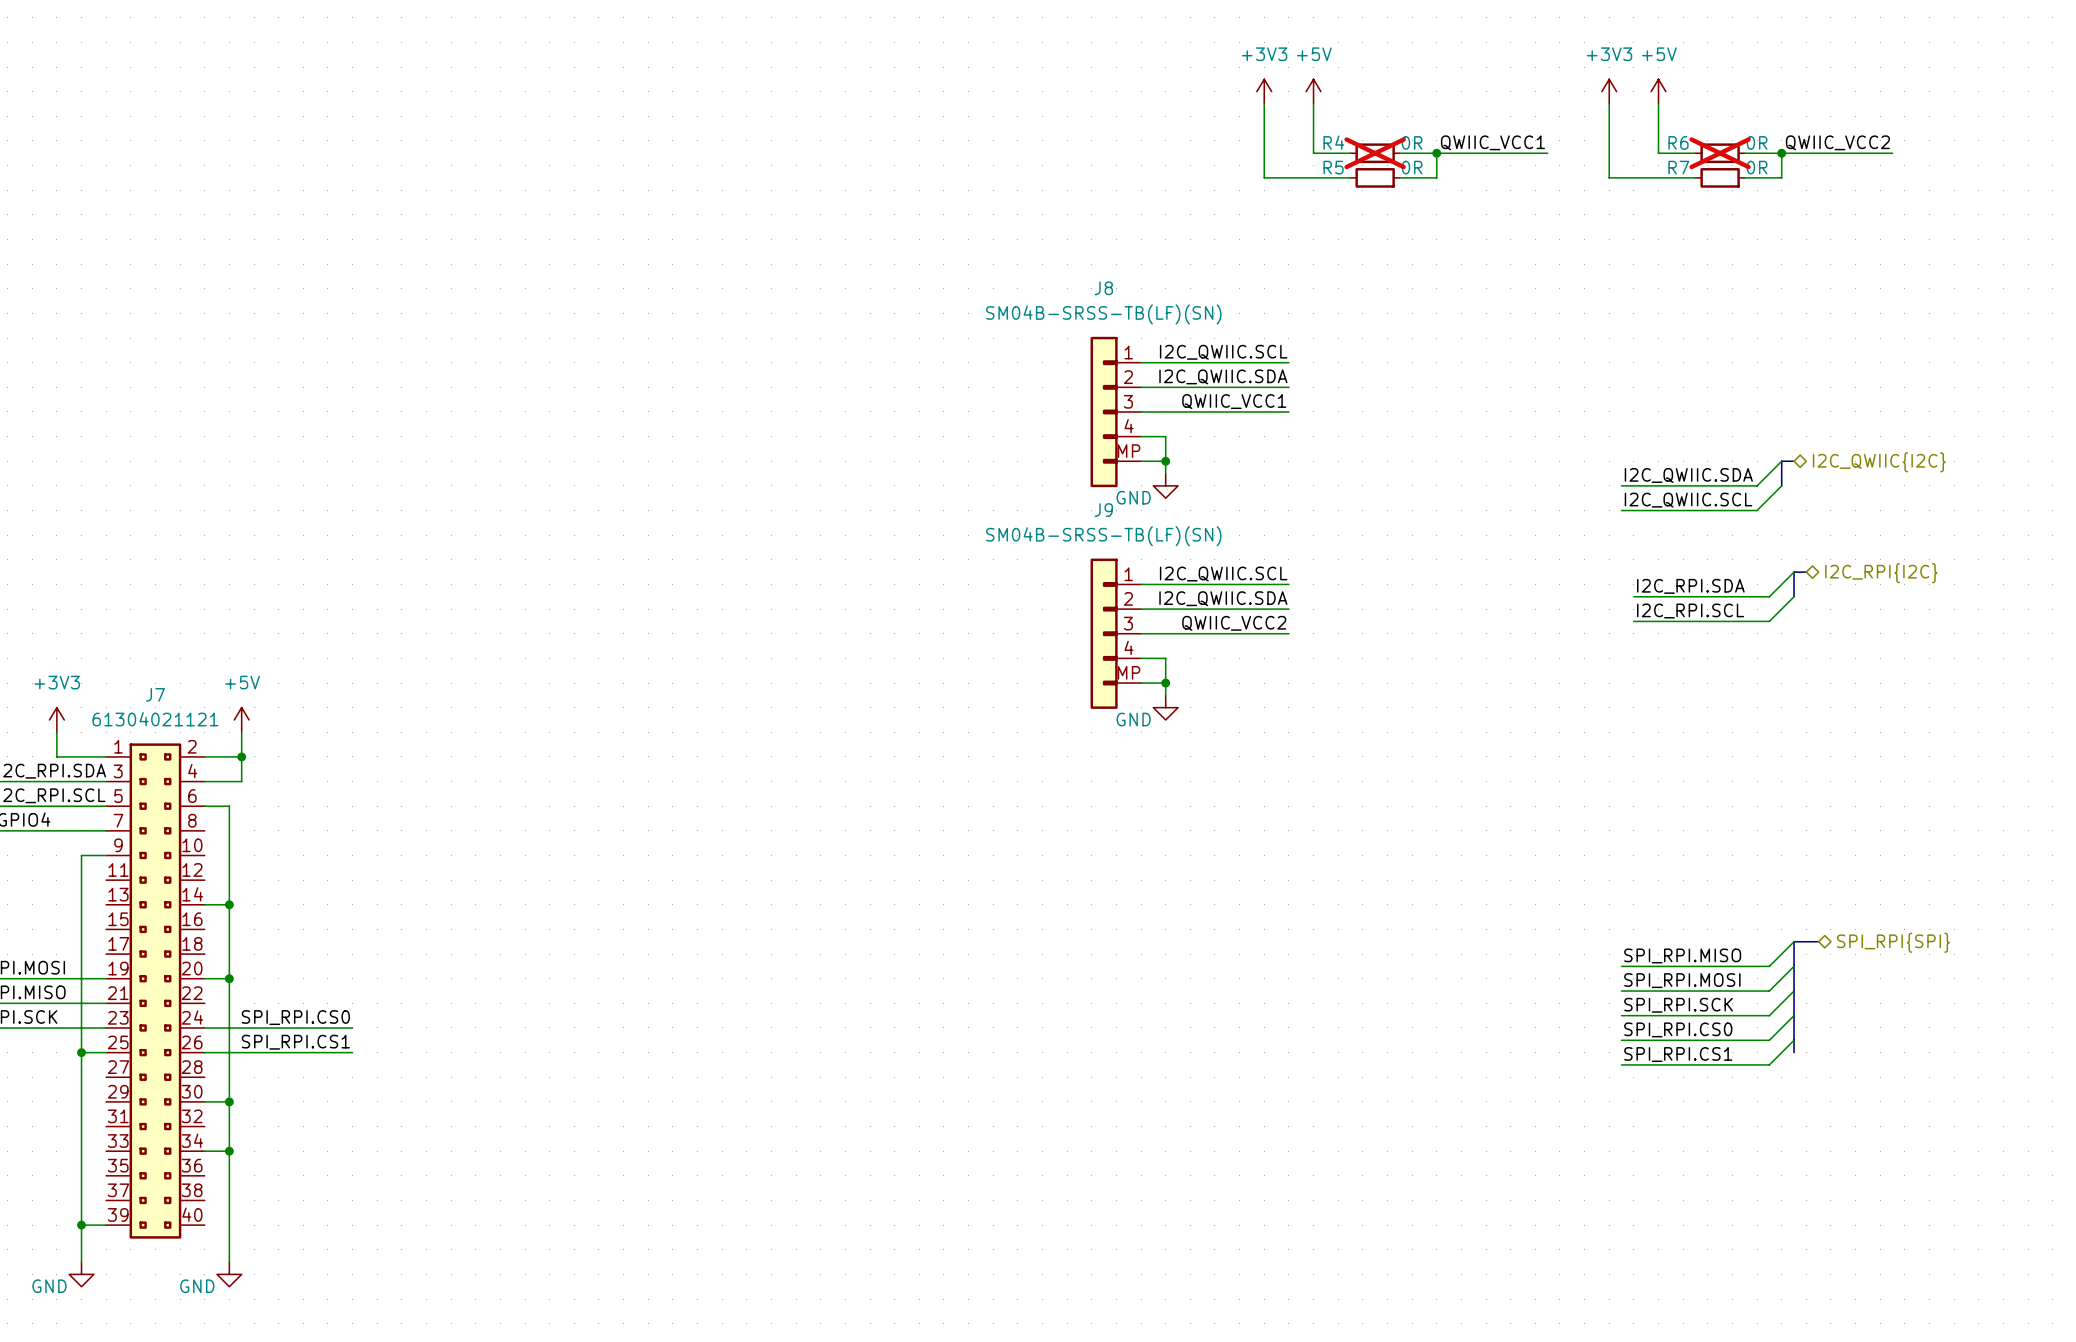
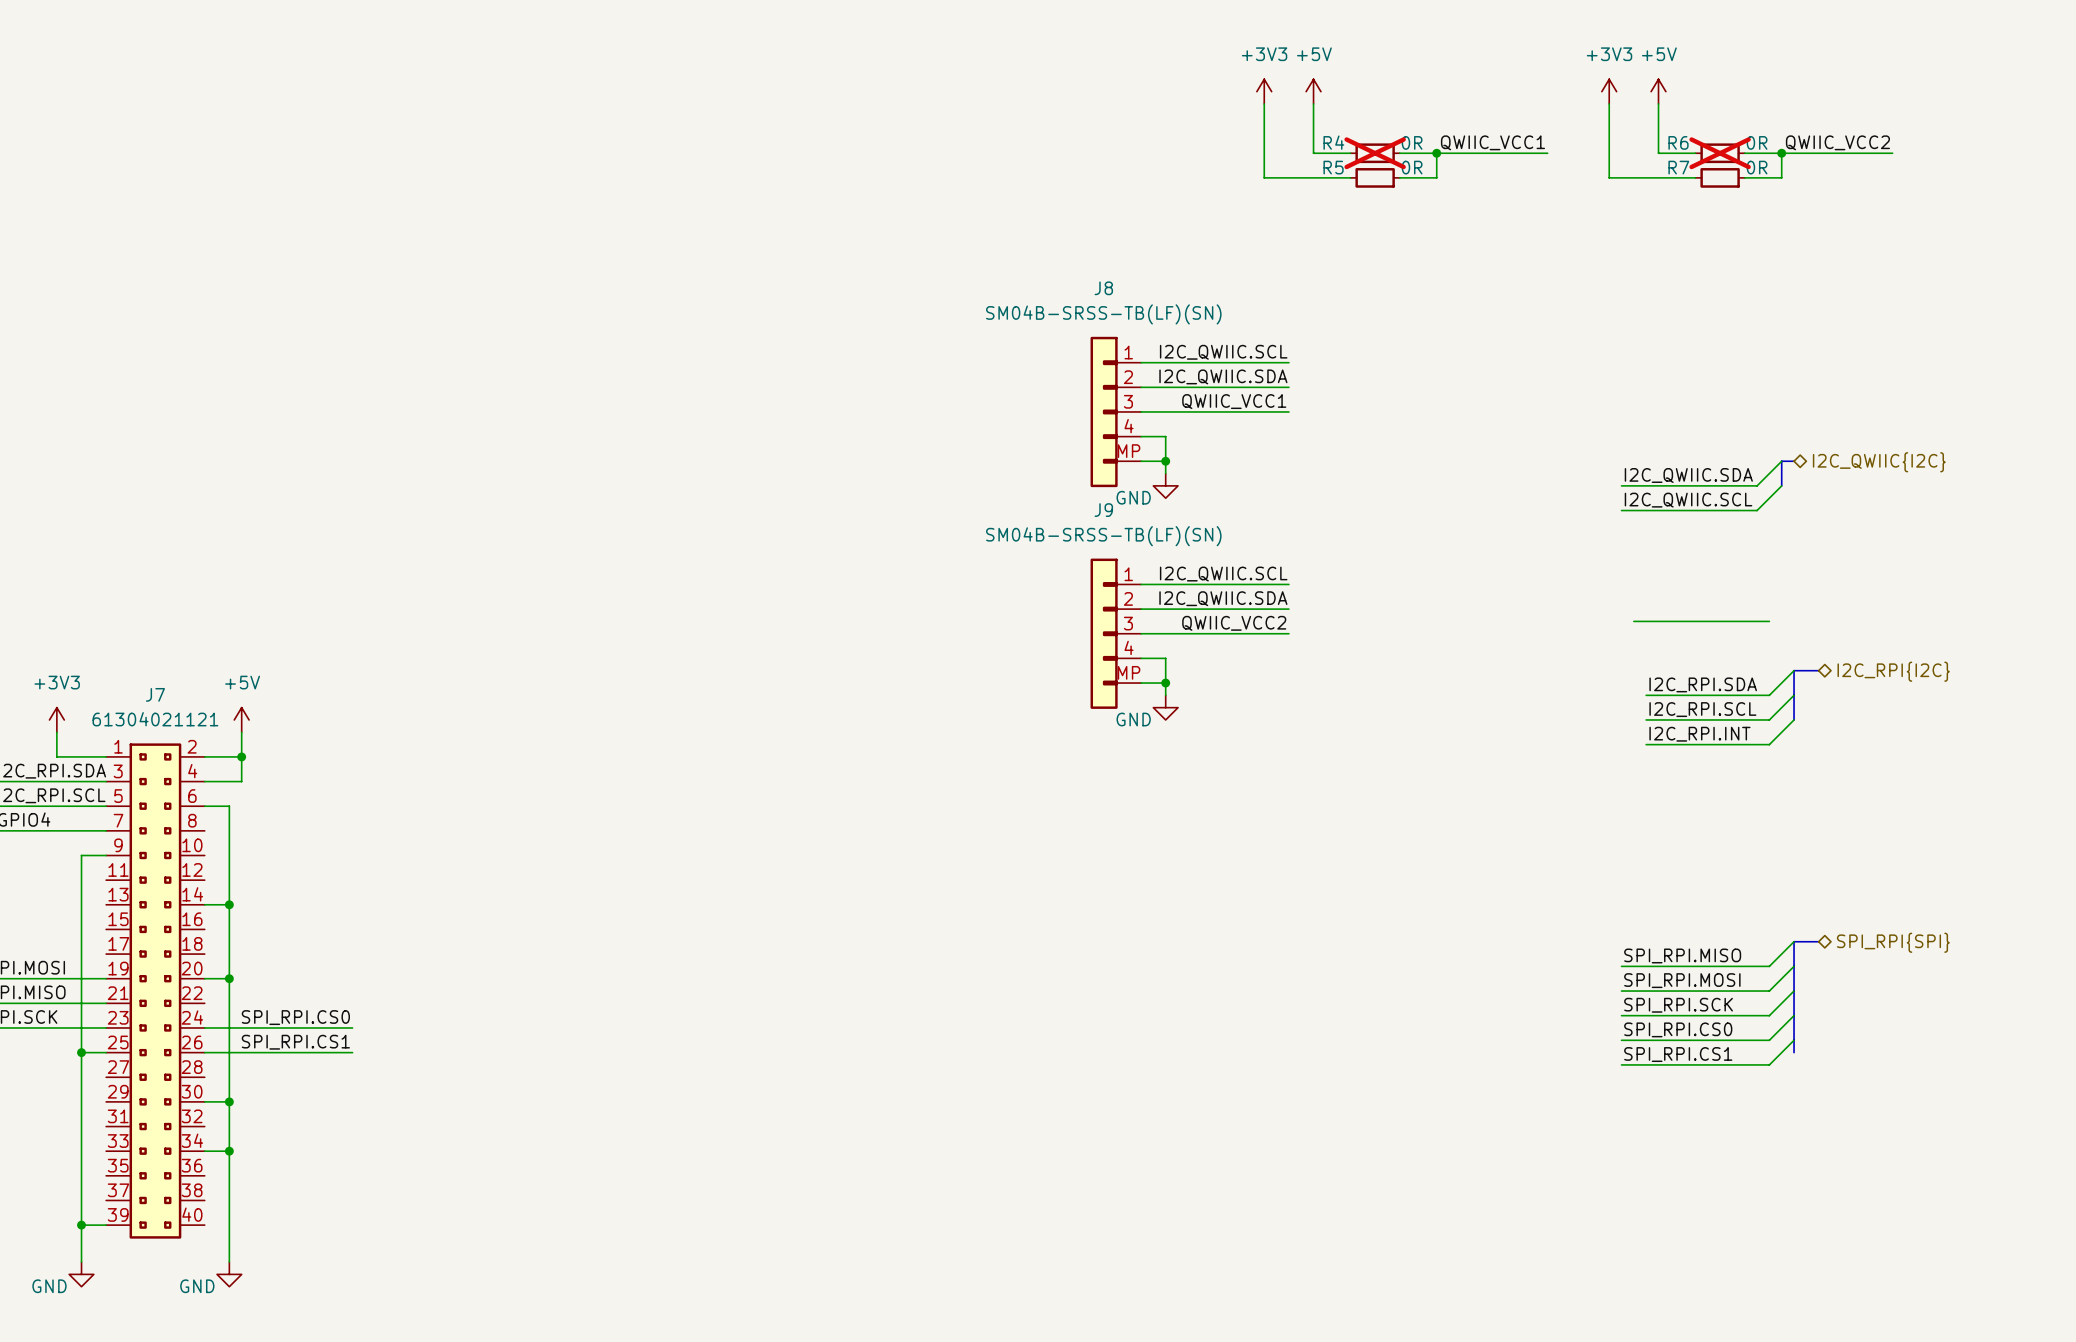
wire: (1794, 572) (1769, 596) (1633, 596) -> none
bus: (1806, 572) (1794, 572) (1794, 596) -> none
hierarchical label position: I2C_RPI{I2C} (1881, 573) -> I2C_RPI{I2C} (1893, 671)
label position: I2C_RPI.SDA (1690, 586) -> I2C_RPI.SDA (1703, 684)
wire: (1794, 596) (1769, 621) -> none
label position: I2C_RPI.SCL (1690, 611) -> I2C_RPI.SCL (1702, 709)
wire: none -> (1794, 670) (1769, 695) (1646, 695)
bus: none -> (1818, 670) (1794, 670) (1794, 719)
wire: none -> (1794, 695) (1769, 719) (1646, 719)
wire: none -> (1794, 719) (1769, 744) (1646, 744)
label: none -> I2C_RPI.INT (1699, 734)

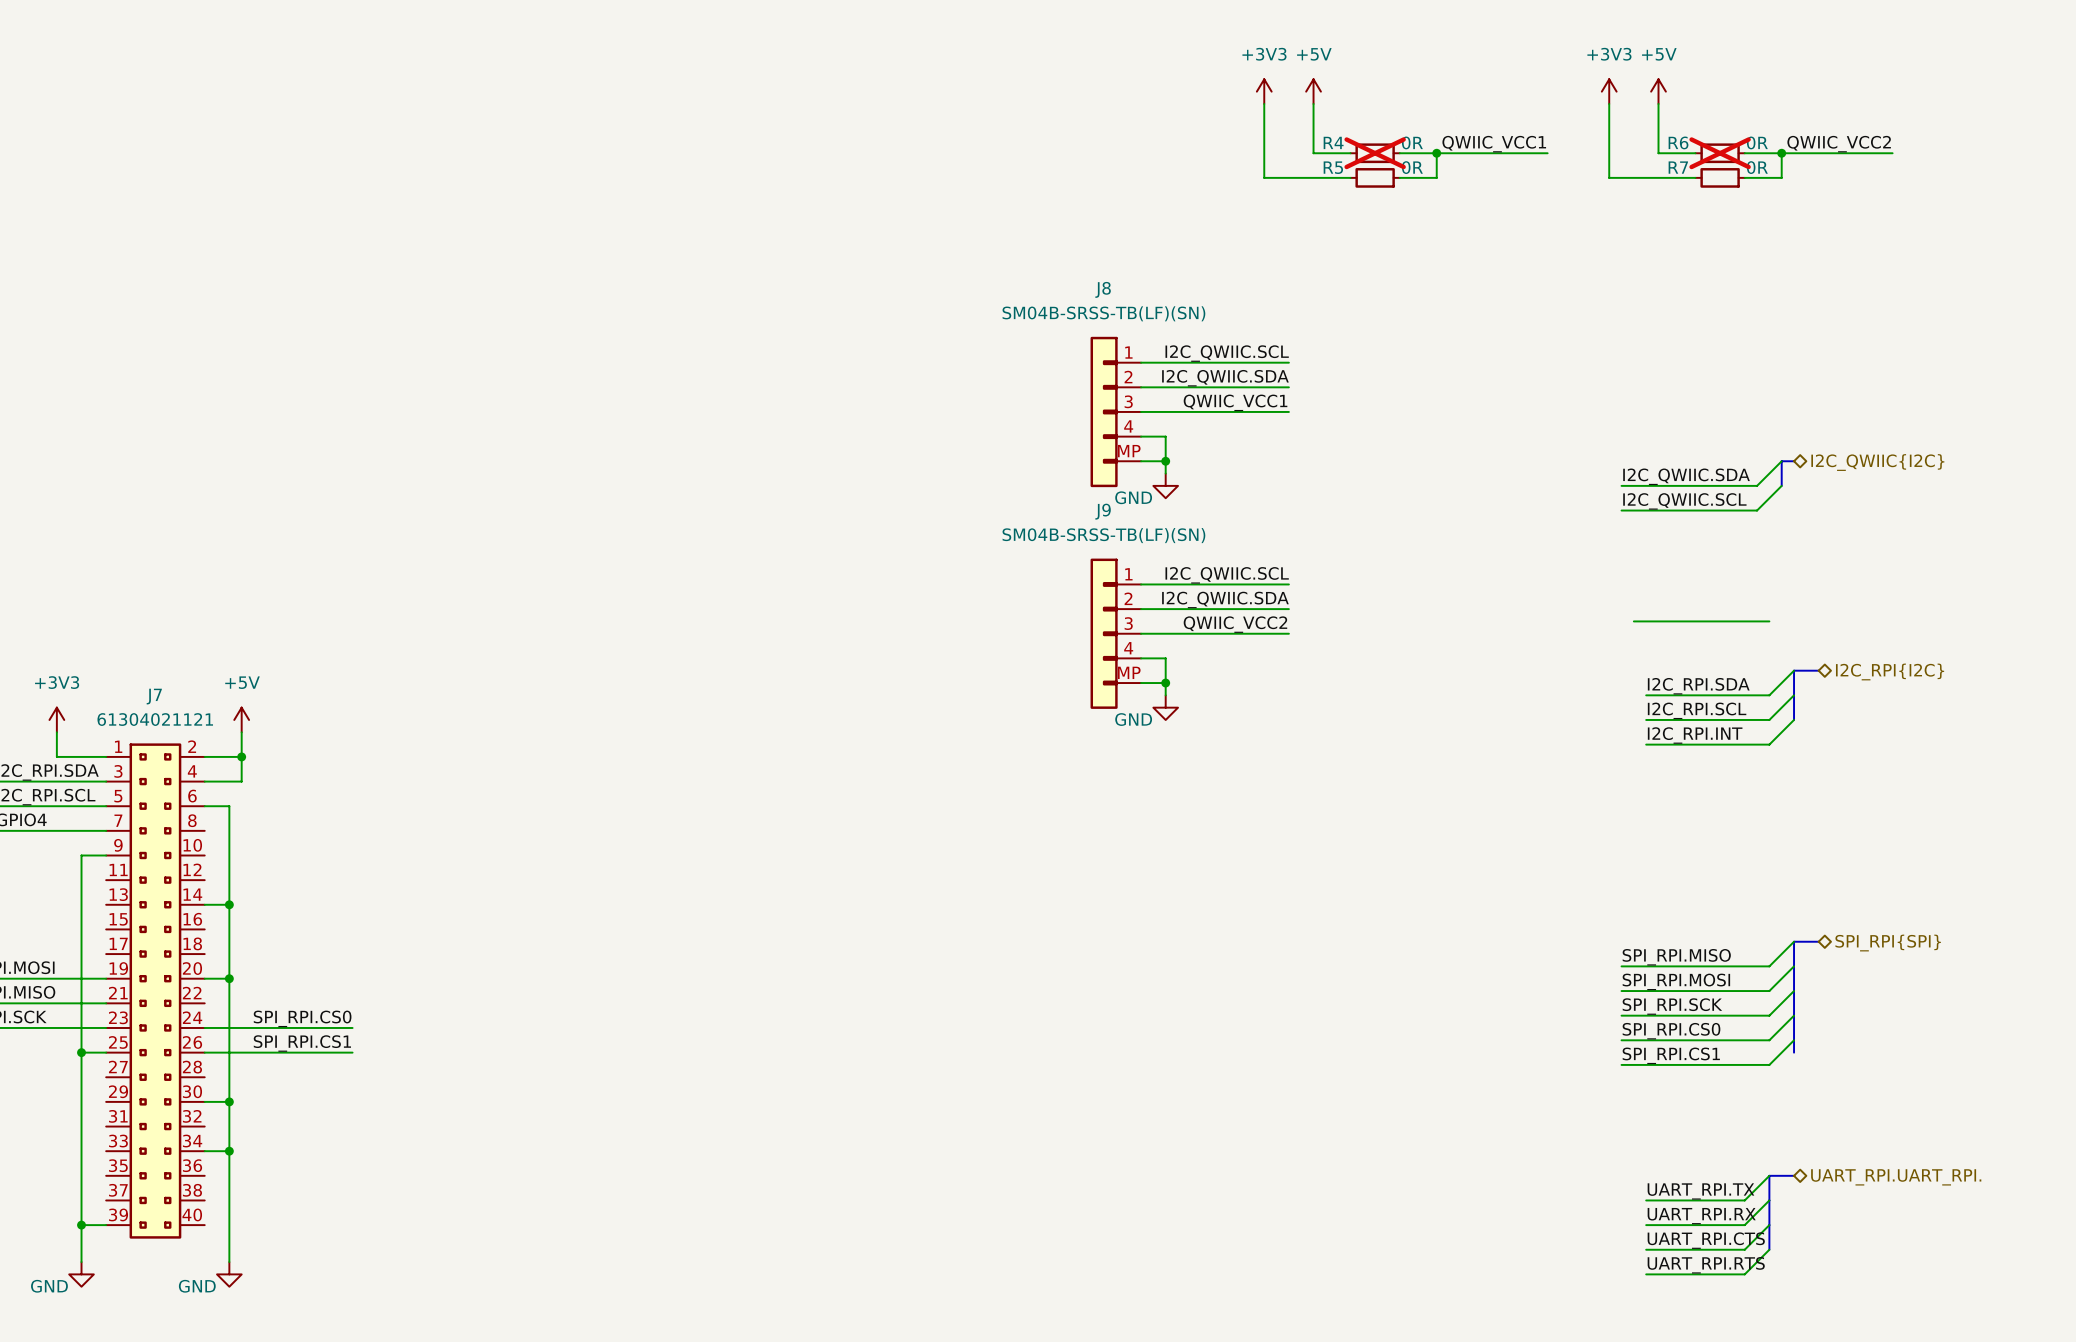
wire: none -> (1769, 1175) (1744, 1200) (1646, 1200)
bus: none -> (1794, 1175) (1769, 1175) (1769, 1249)
hierarchical label: none -> UART_RPI.UART_RPI. (1896, 1177)
label: none -> UART_RPI.TX (1700, 1191)
wire: none -> (1769, 1200) (1744, 1225) (1646, 1225)
label: none -> UART_RPI.RX (1701, 1216)
wire: none -> (1769, 1225) (1744, 1249) (1646, 1249)
label: none -> UART_RPI.CTS (1706, 1240)
wire: none -> (1769, 1249) (1744, 1274) (1646, 1274)
label: none -> UART_RPI.RTS (1706, 1265)

